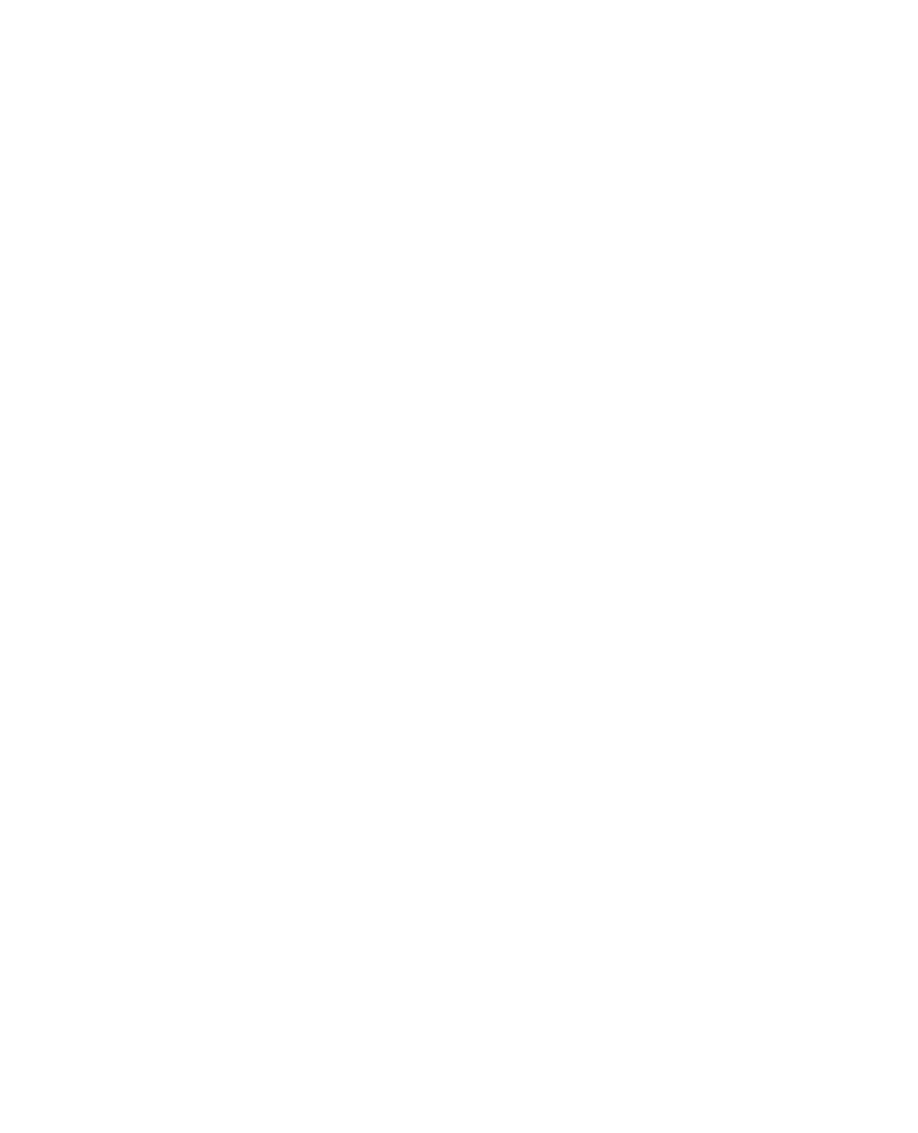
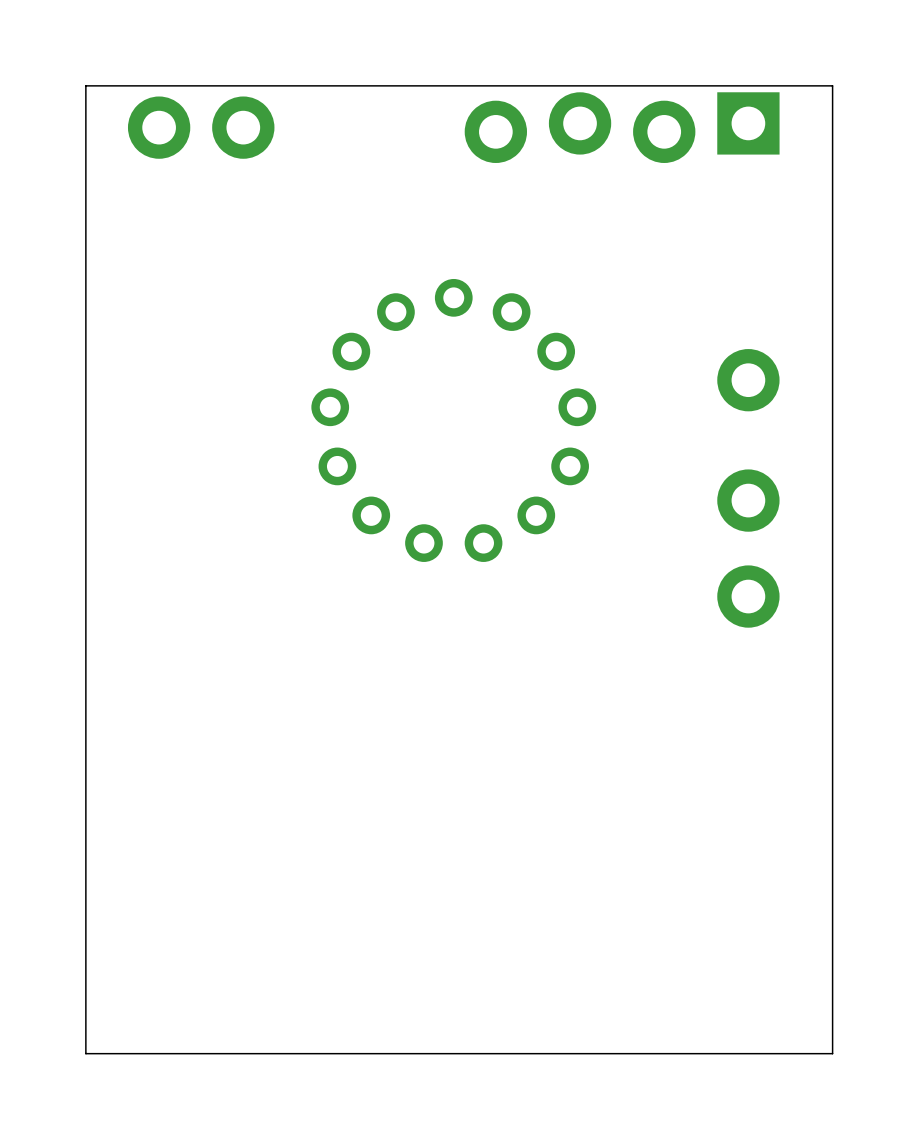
board edge: none -> (832, 85) (85, 85) (85, 1053) (832, 1053) (832, 85)
part: none -> (201, 127)
part: none -> (622, 127)
part: none -> (748, 380)
part: none -> (453, 420)
part: none -> (748, 548)

